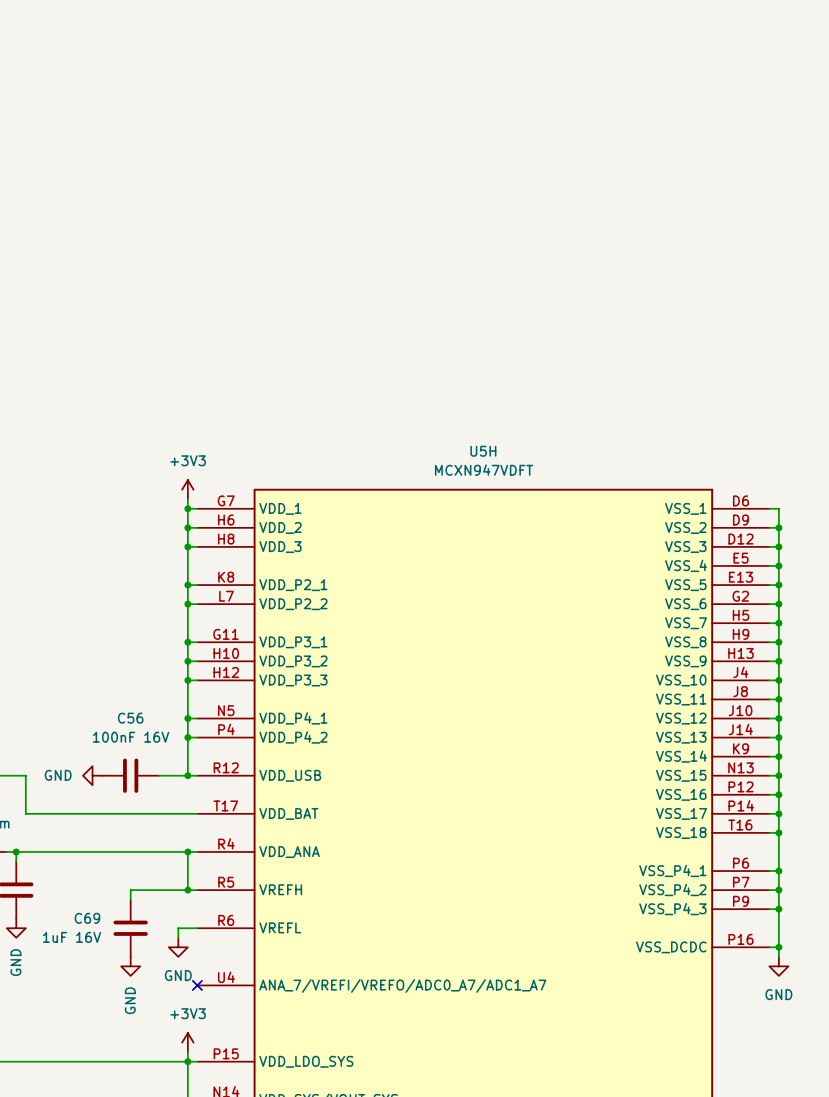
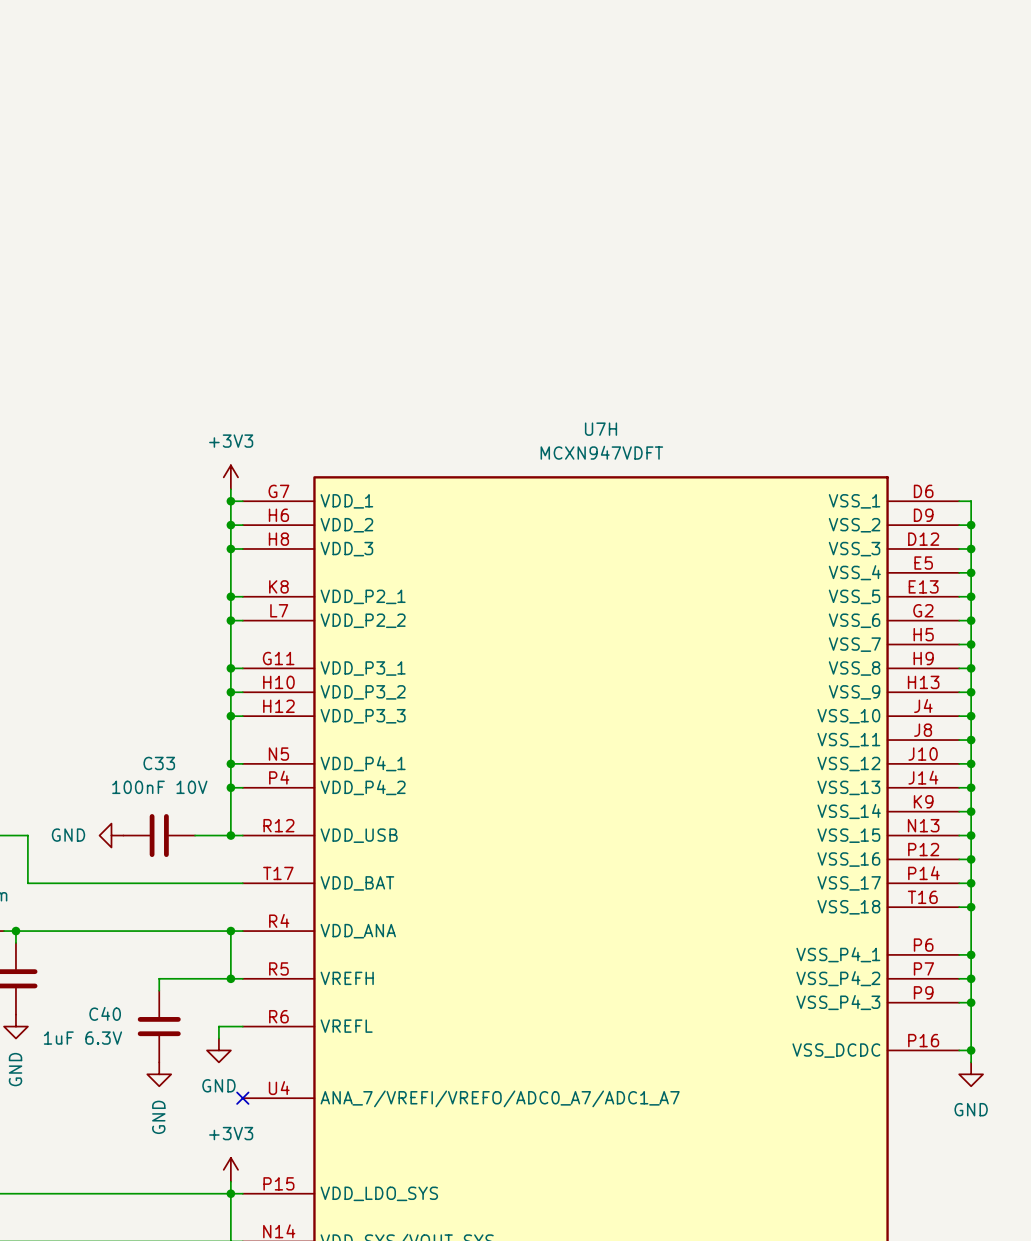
U5H name: U5H (483, 451) -> U7H (601, 429)
C56 name: C56 (130, 718) -> C33 (159, 763)
C56 value: 100nF 16V (131, 737) -> 100nF 10V (159, 787)
C69 name: C69 (87, 918) -> C40 (105, 1013)
C69 value: 1uF 16V (72, 937) -> 1uF 6.3V (82, 1038)

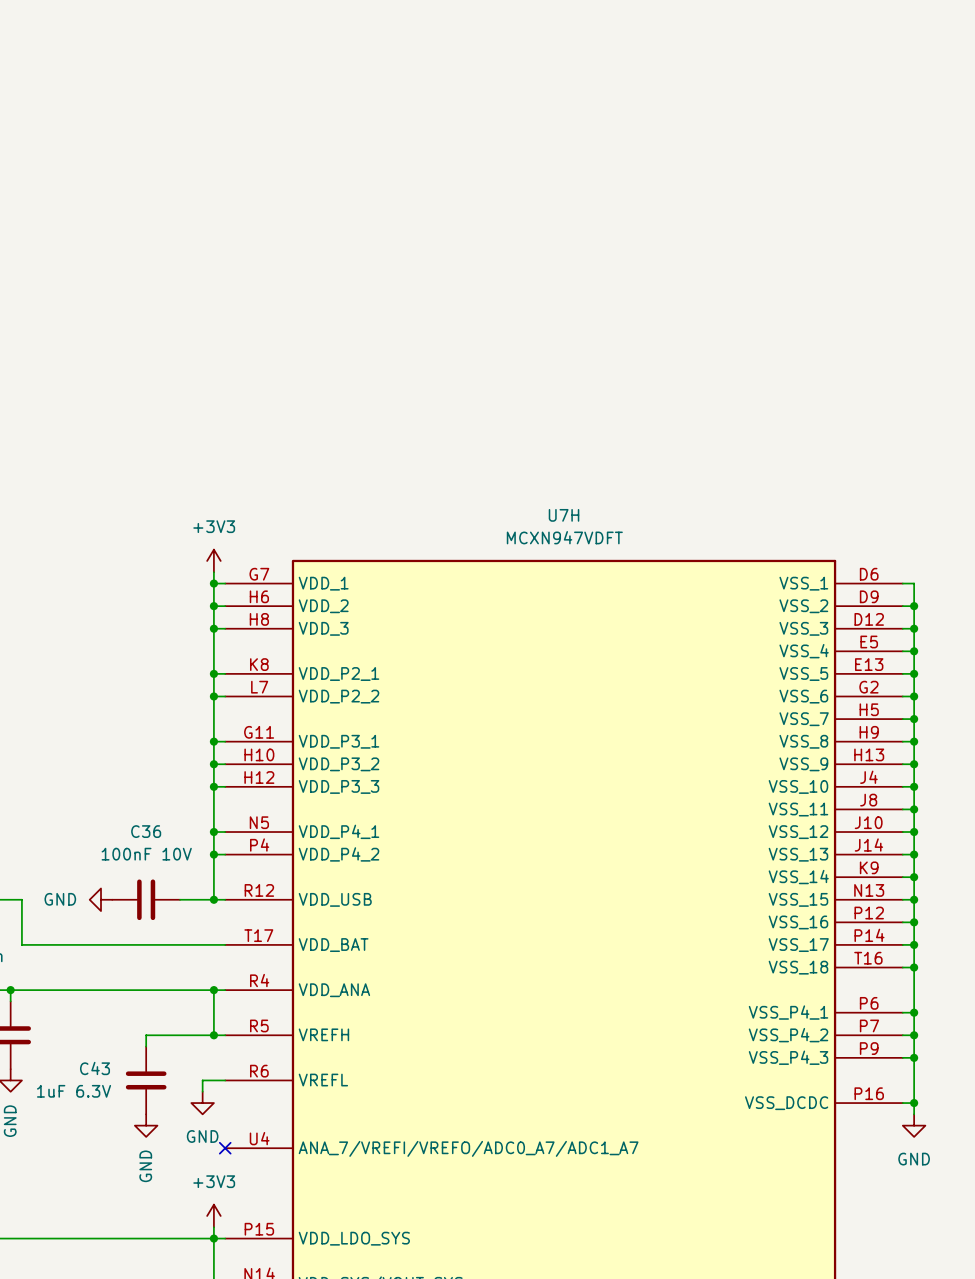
C33 name: C33 (159, 763) -> C36 (146, 831)
C40 name: C40 (105, 1013) -> C43 (95, 1068)

